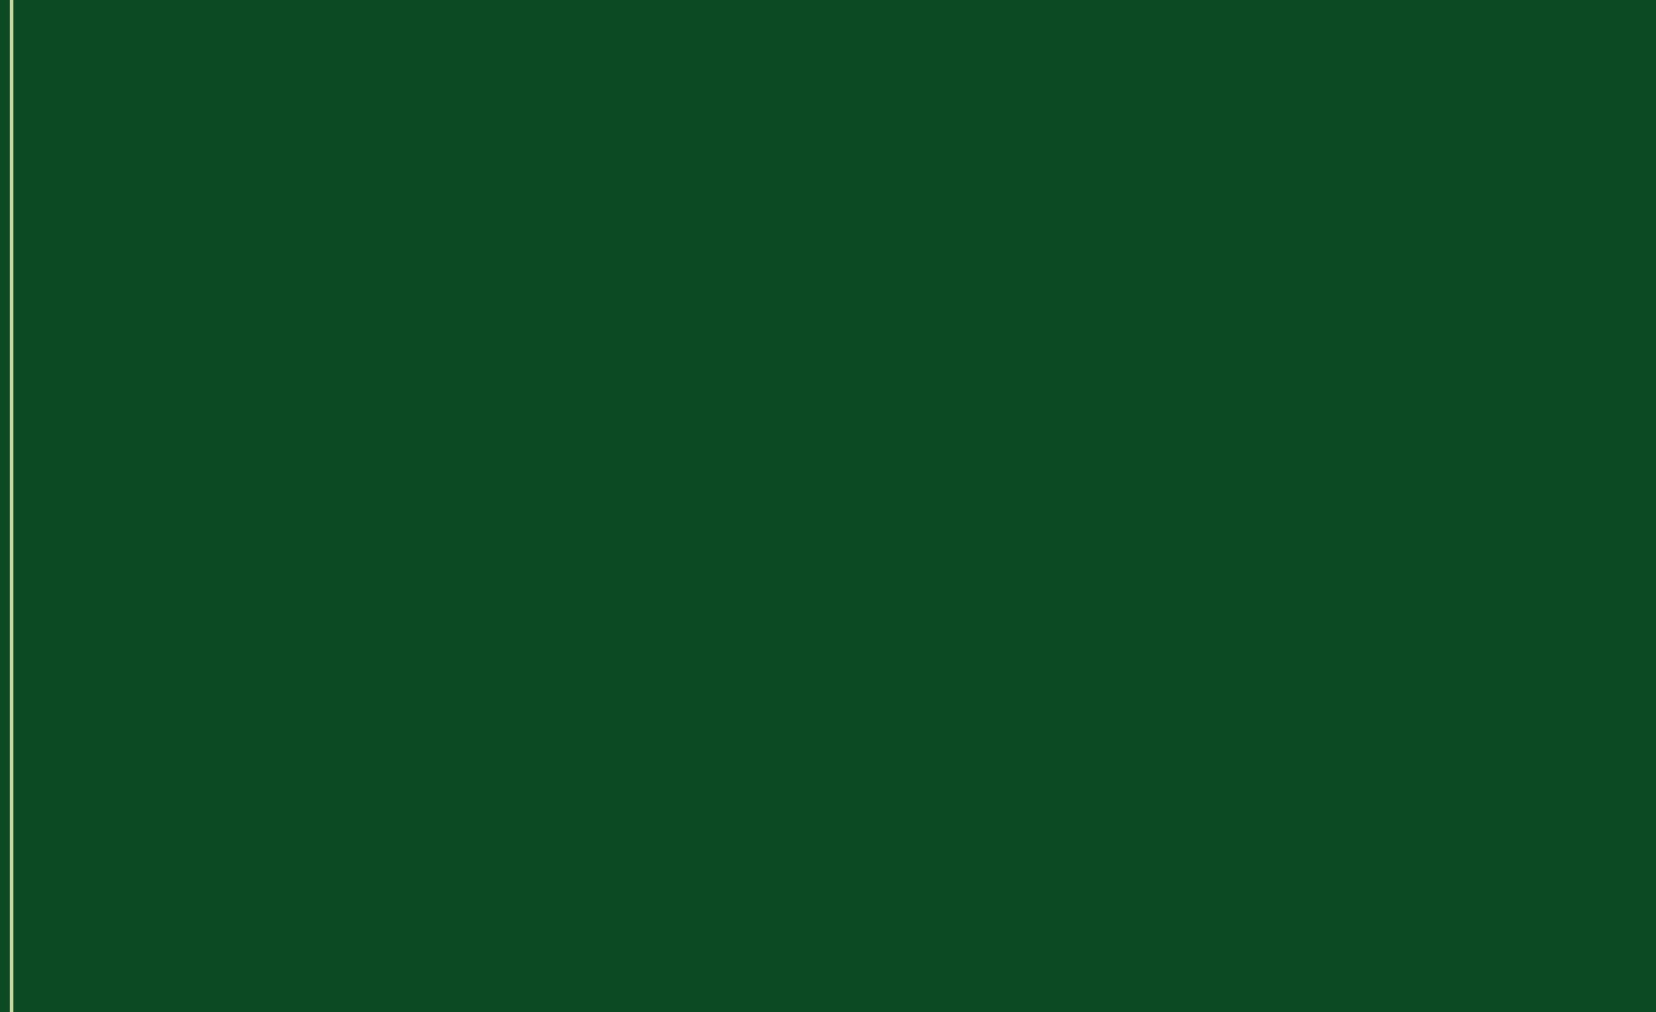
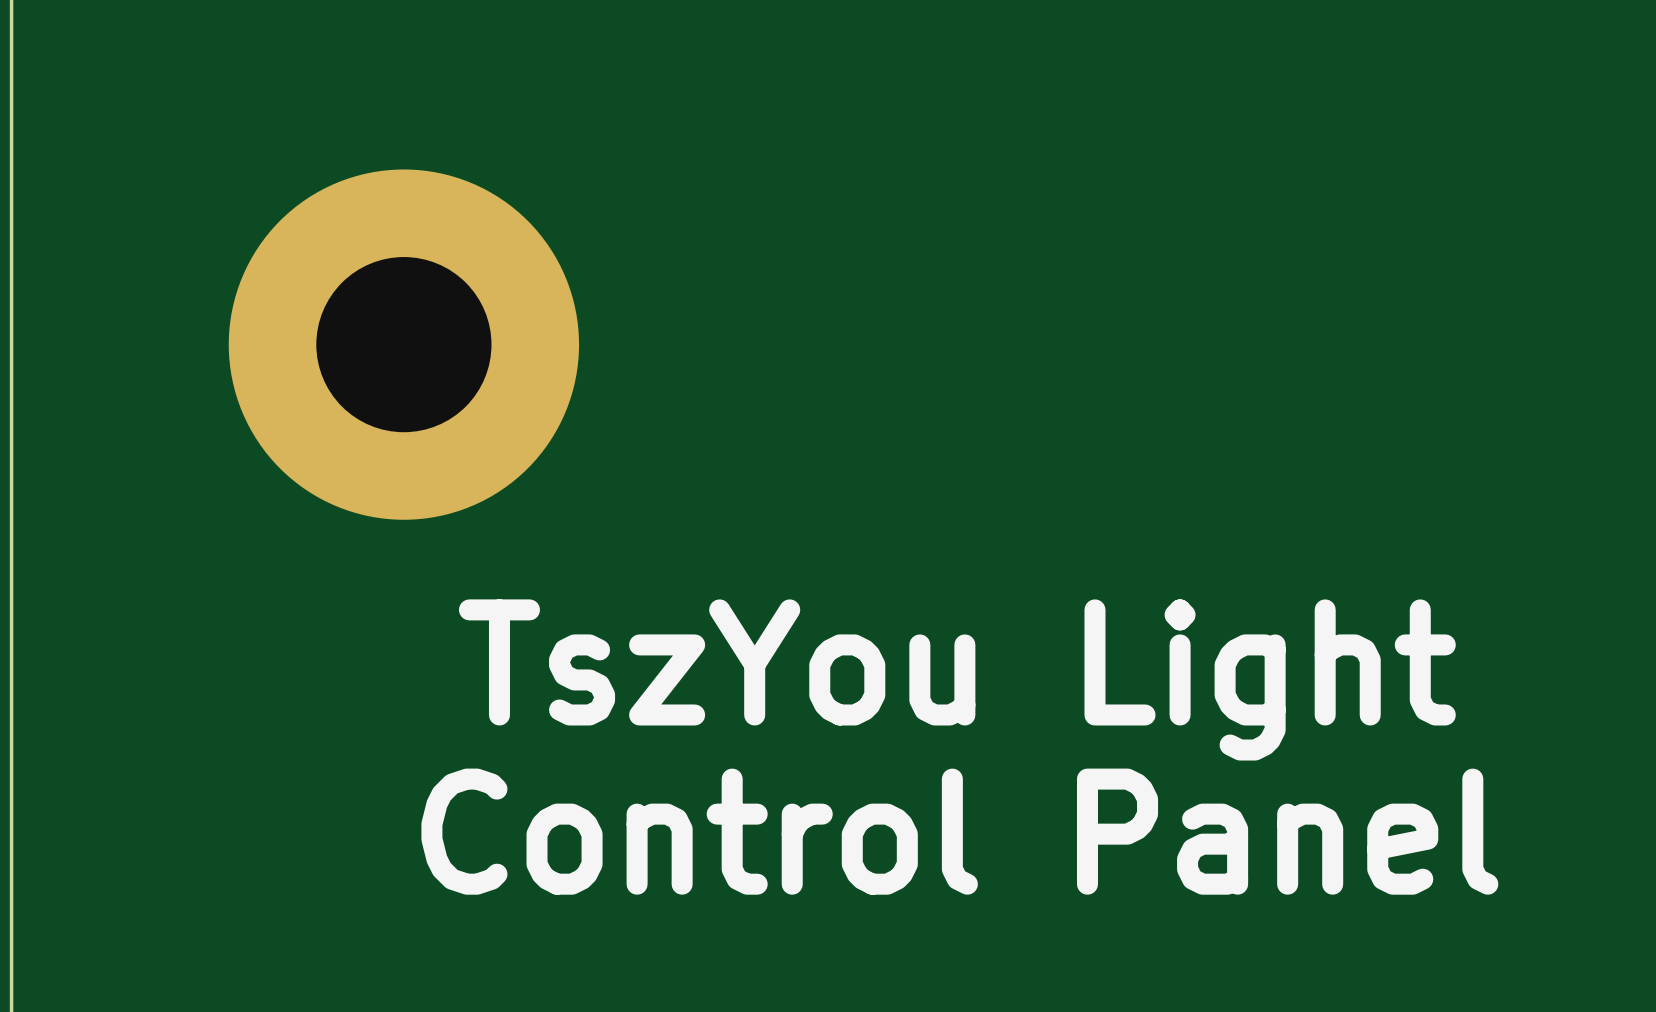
part: none -> (403, 344)
text: none -> TszYou Light (957, 679)
text: none -> Control Panel (959, 831)

